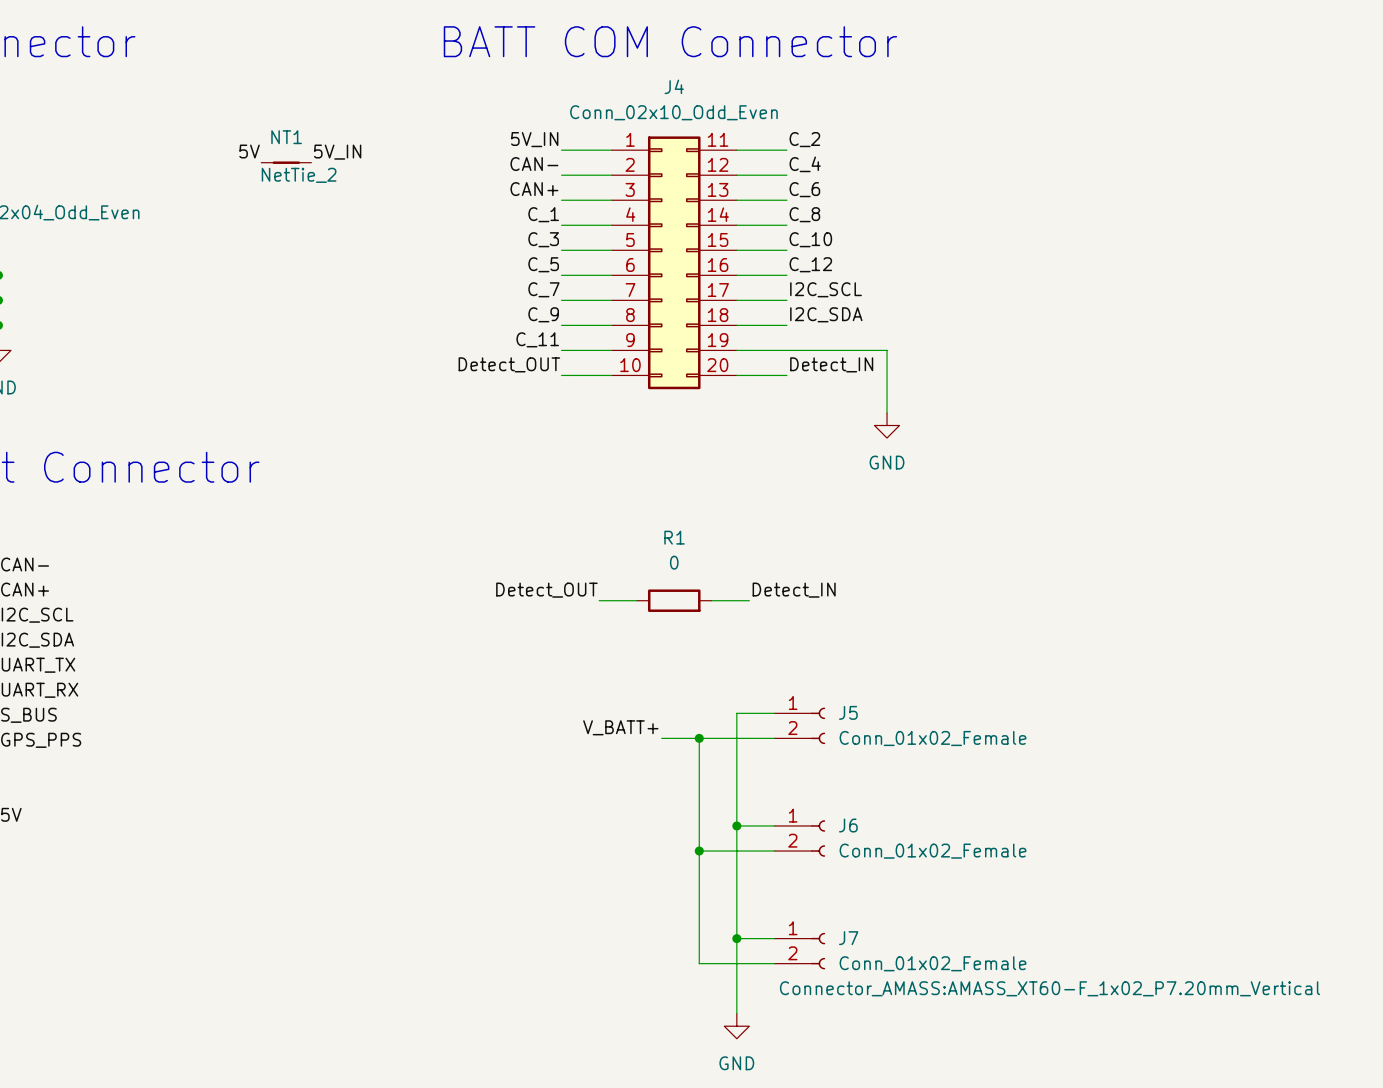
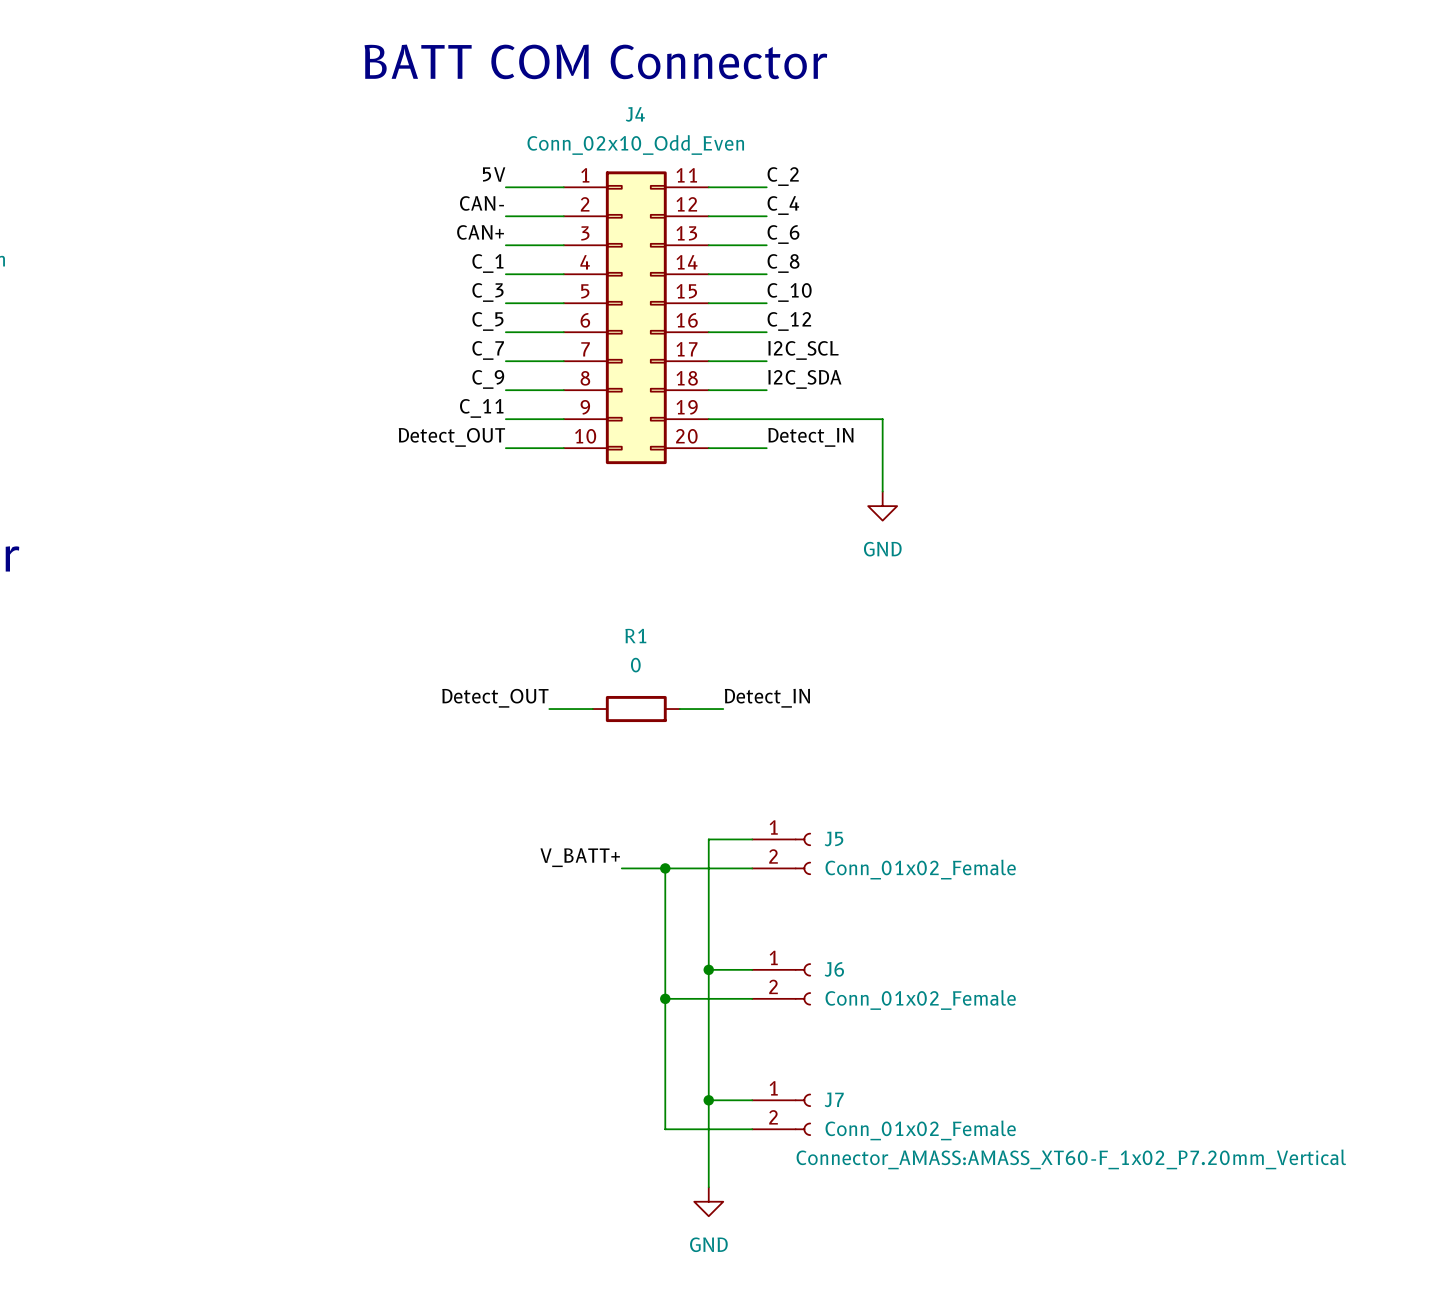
label: 5V_IN (534, 139) -> 5V (494, 174)
label: 5V (249, 151) -> none
label: 5V_IN (337, 152) -> none
NT1: NetTie_2 (286, 162) -> none

